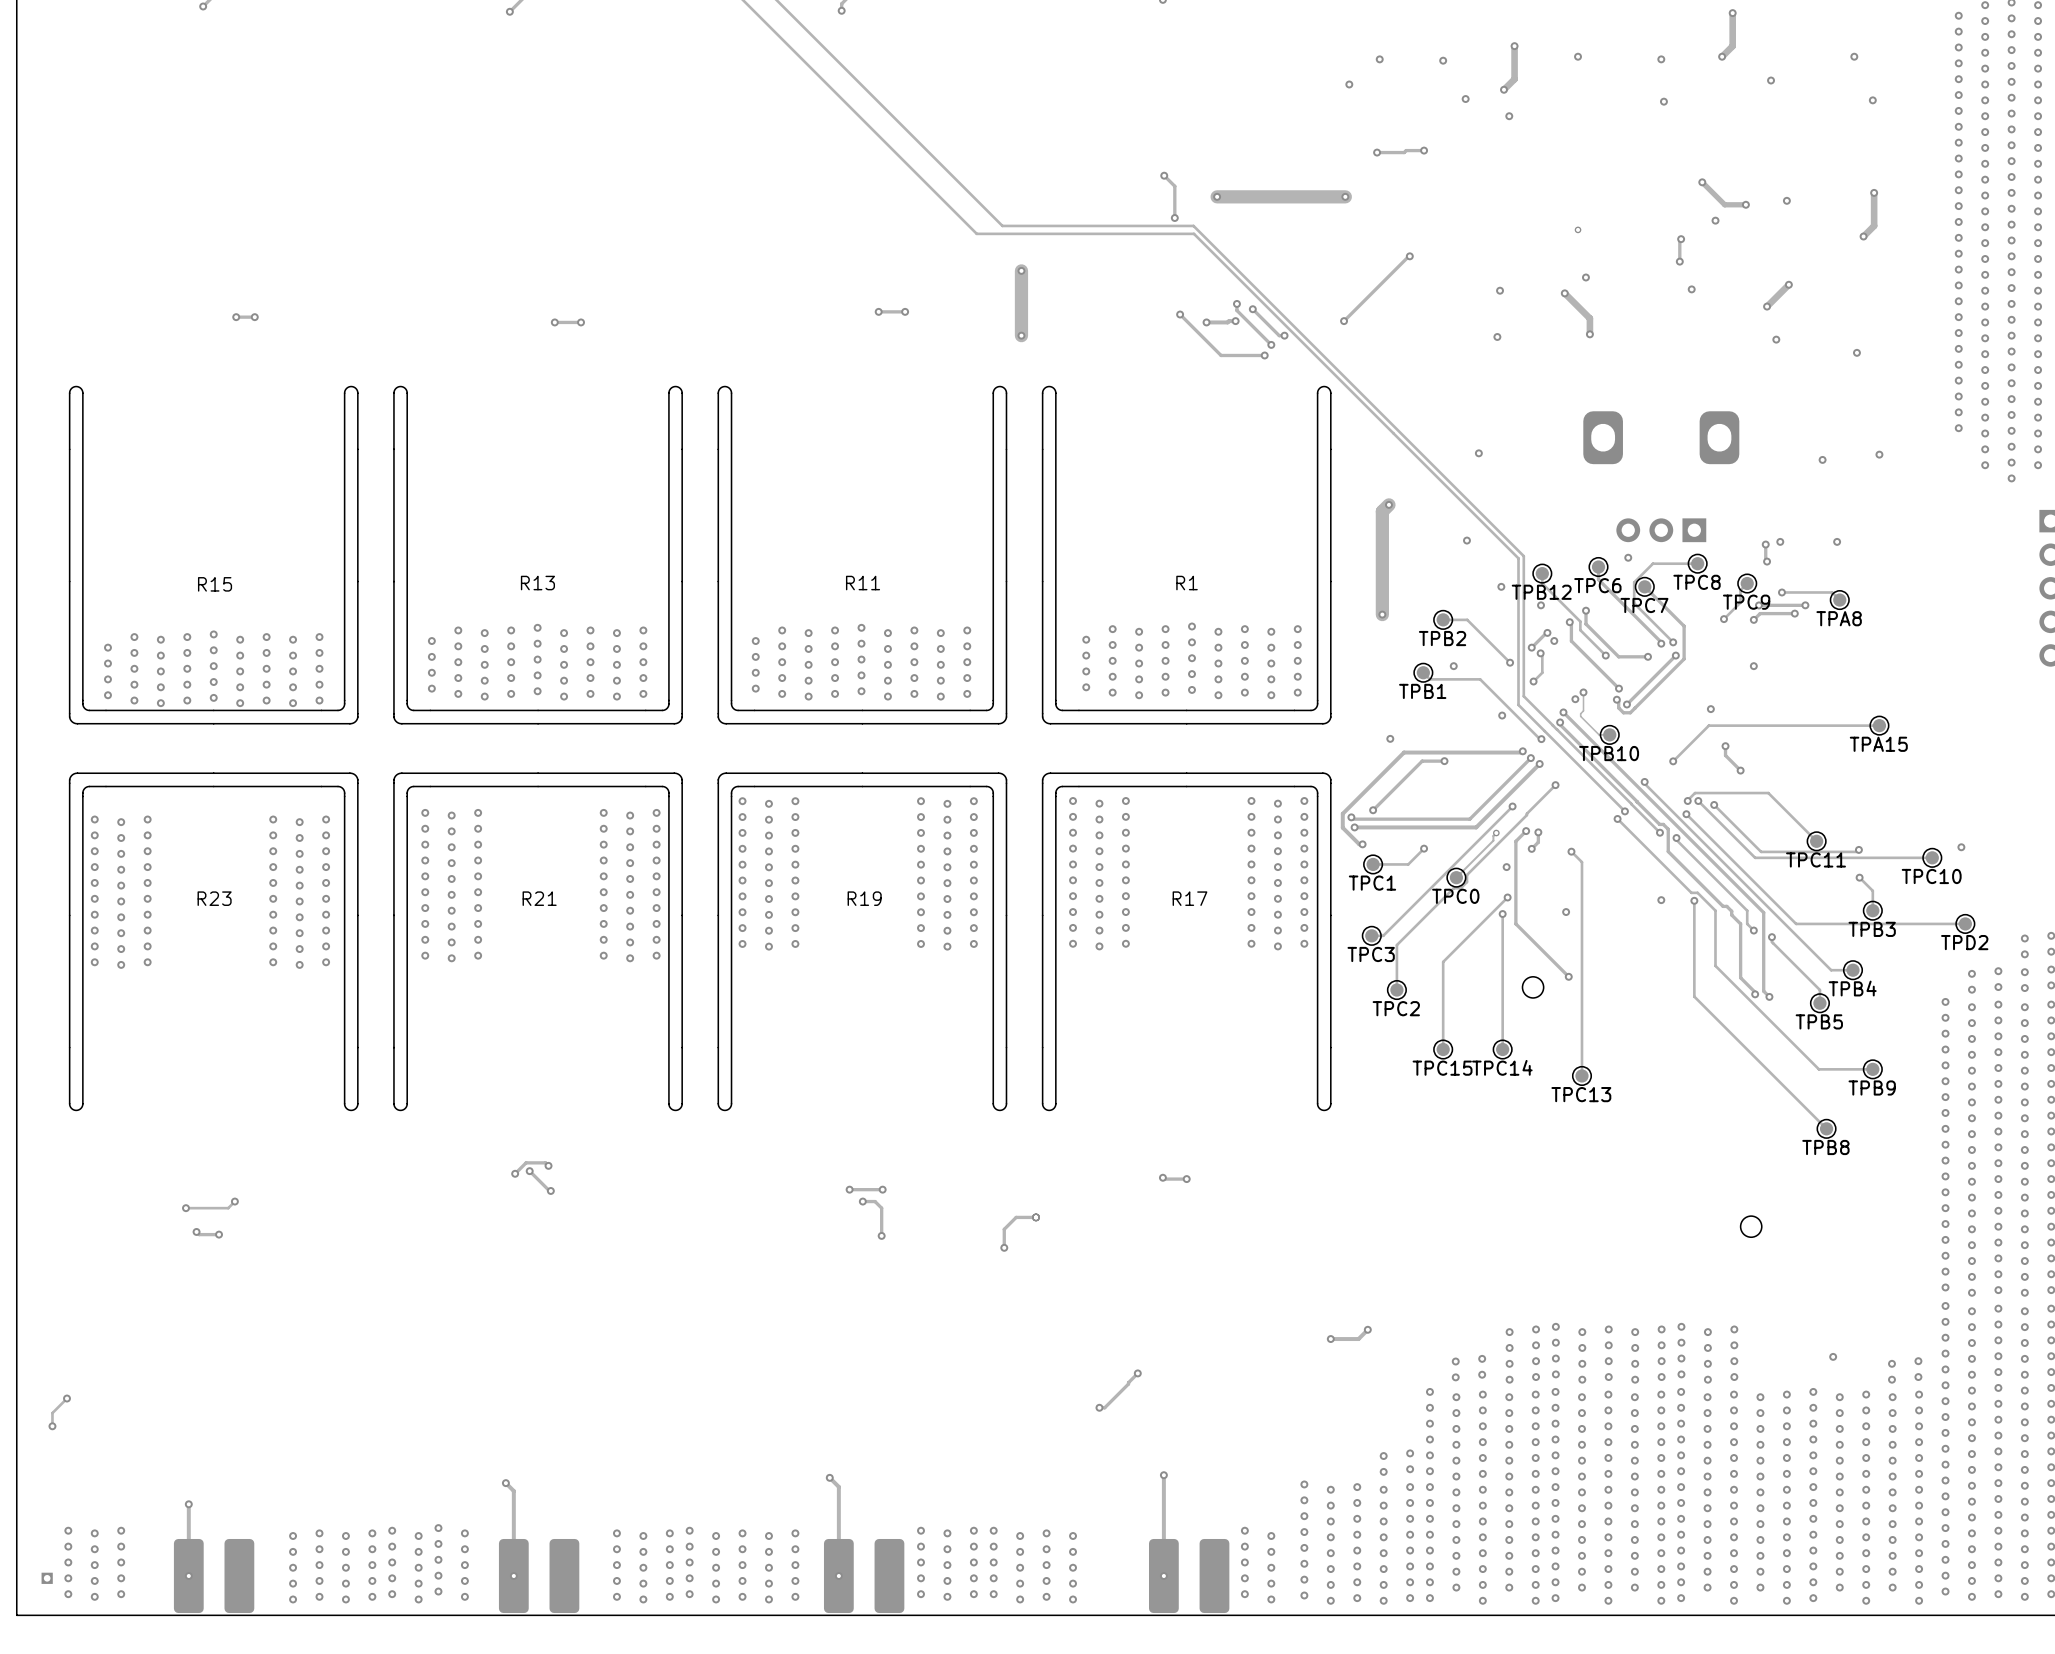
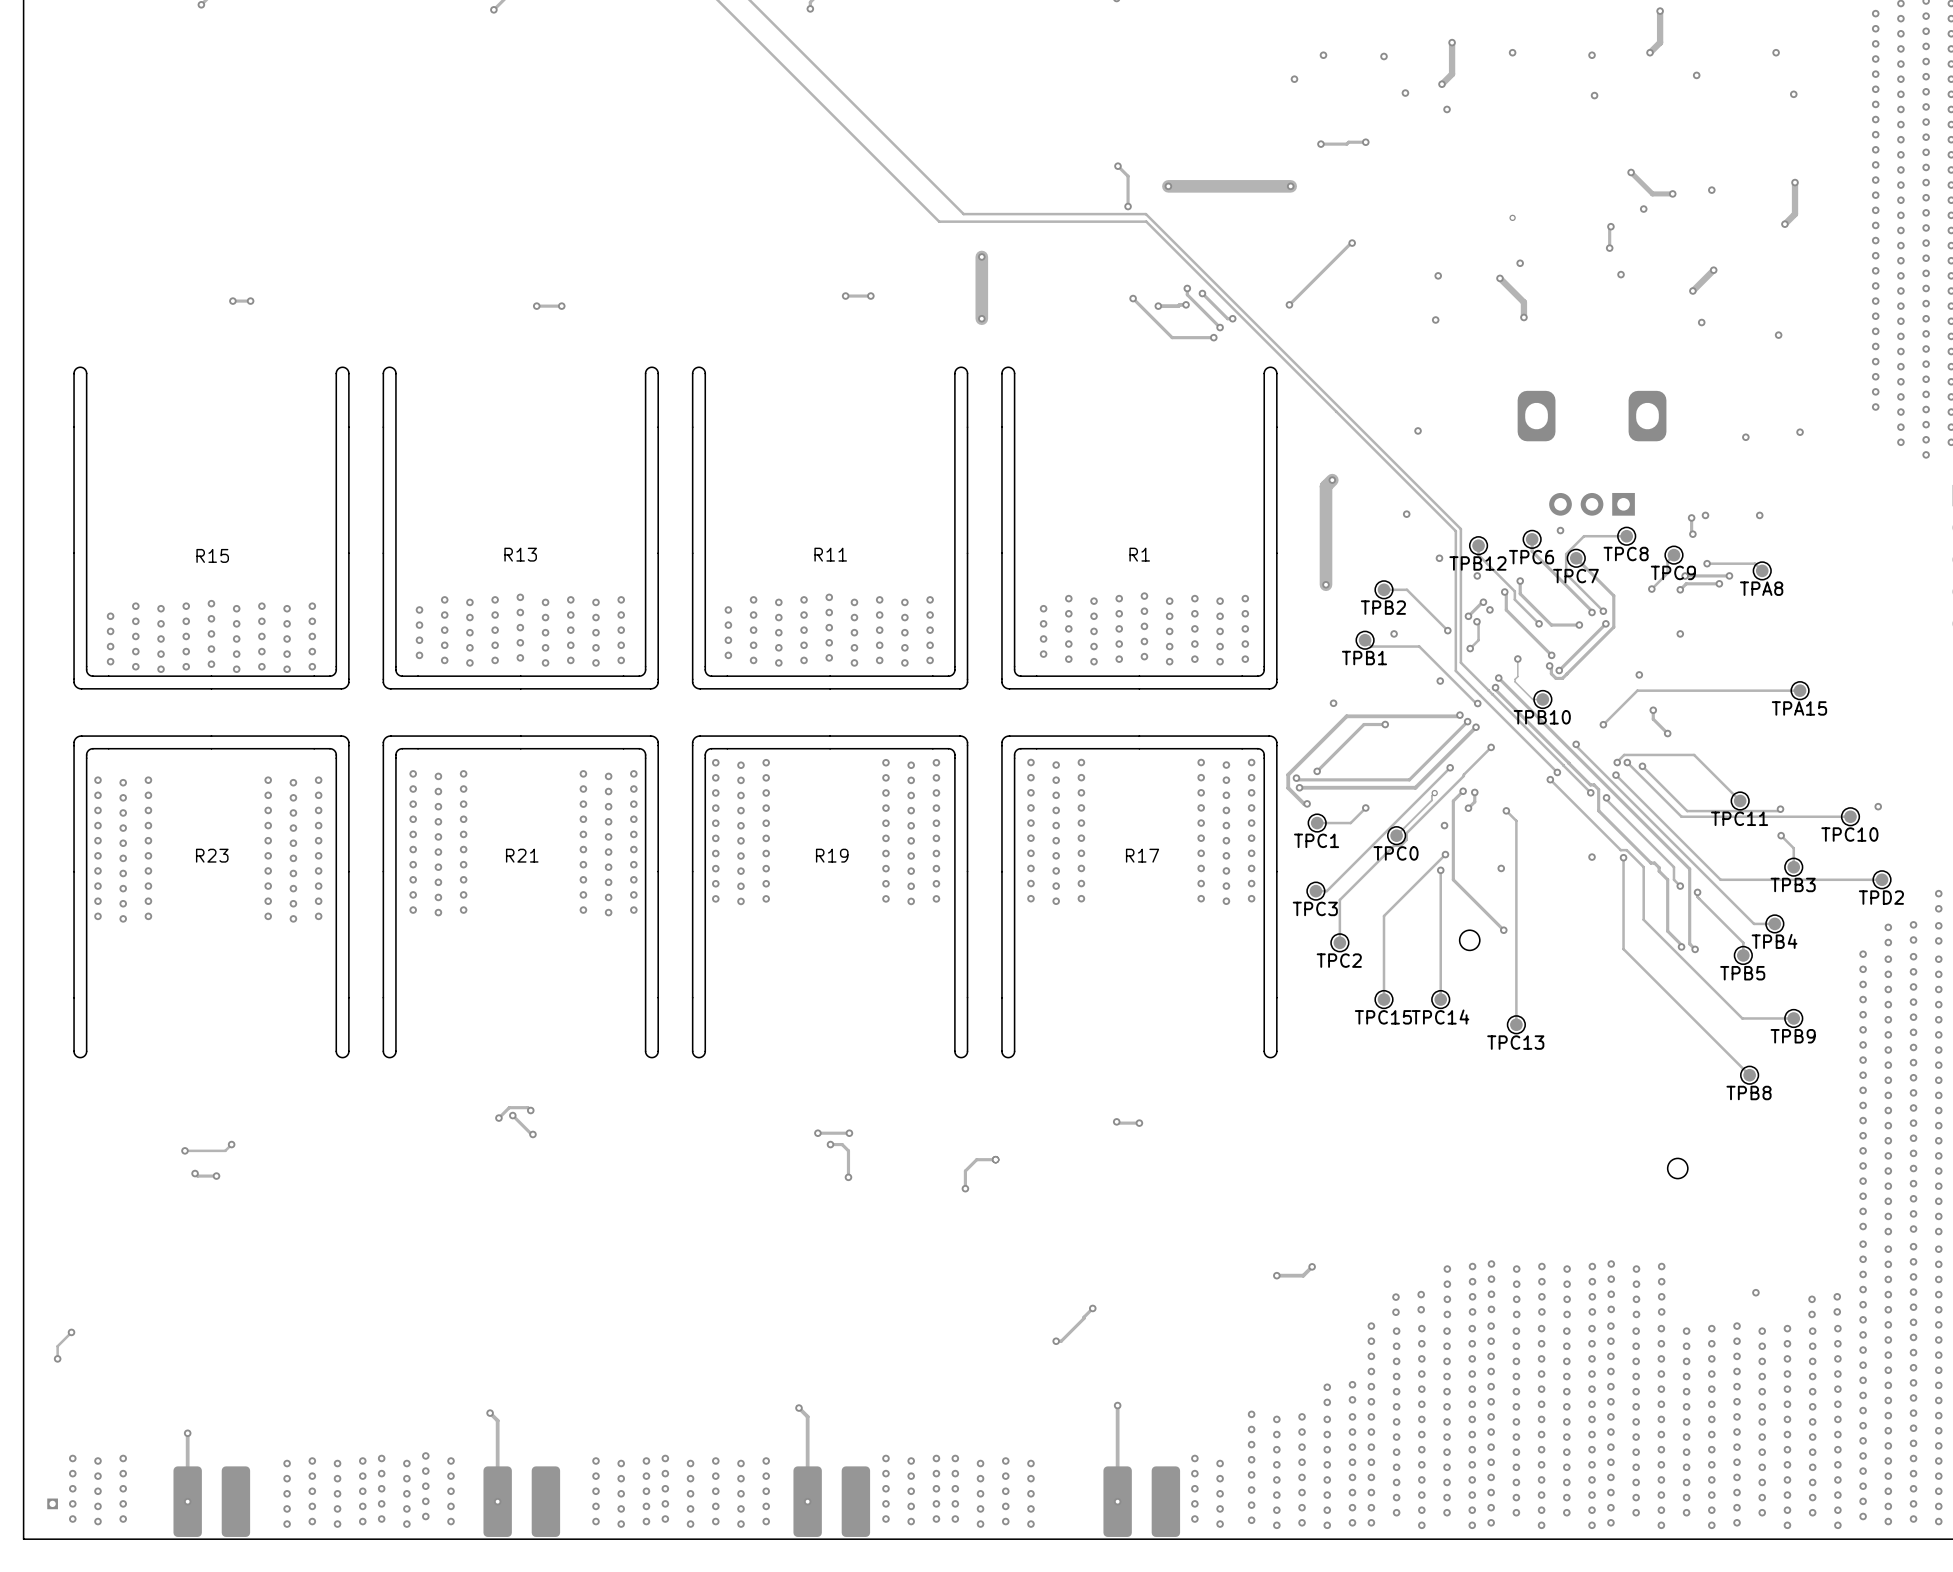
via: (1575, 699) -> none

